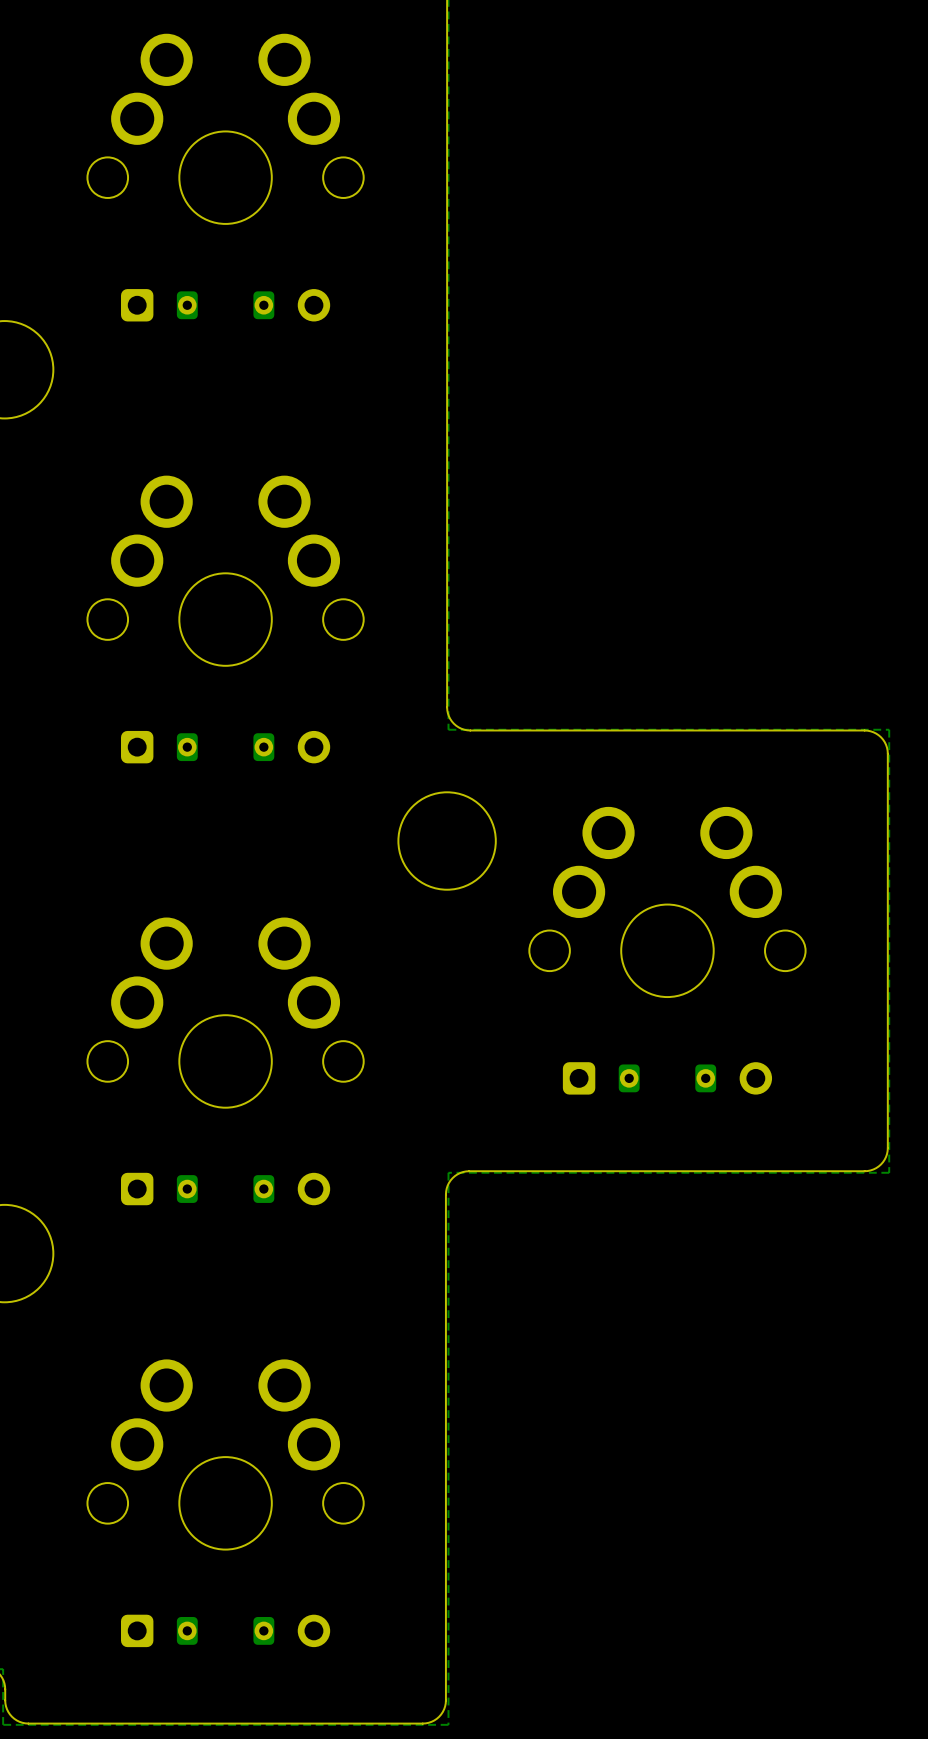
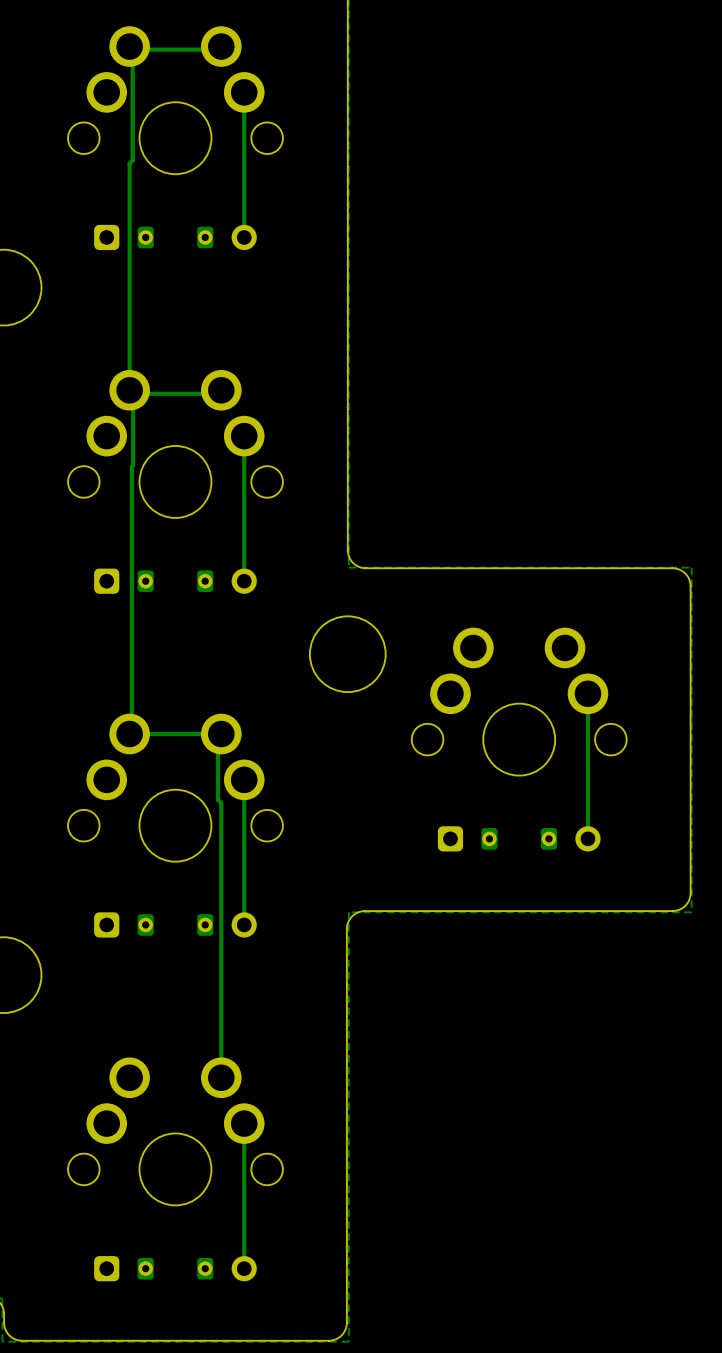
track: none -> (221, 46) (218, 49) (132, 49)
track: none -> (132, 49) (132, 160) (129, 163) (129, 390) (133, 393)
track: none -> (244, 92) (244, 237)
track: none -> (221, 390) (217, 393) (133, 393)
track: none -> (133, 393) (131, 734)
track: none -> (244, 436) (244, 581)
track: none -> (587, 693) (587, 838)
track: none -> (217, 734) (217, 799) (221, 803) (221, 1077)
track: none -> (221, 734) (129, 734)
track: none -> (244, 779) (244, 924)
track: none -> (244, 1123) (244, 1268)

